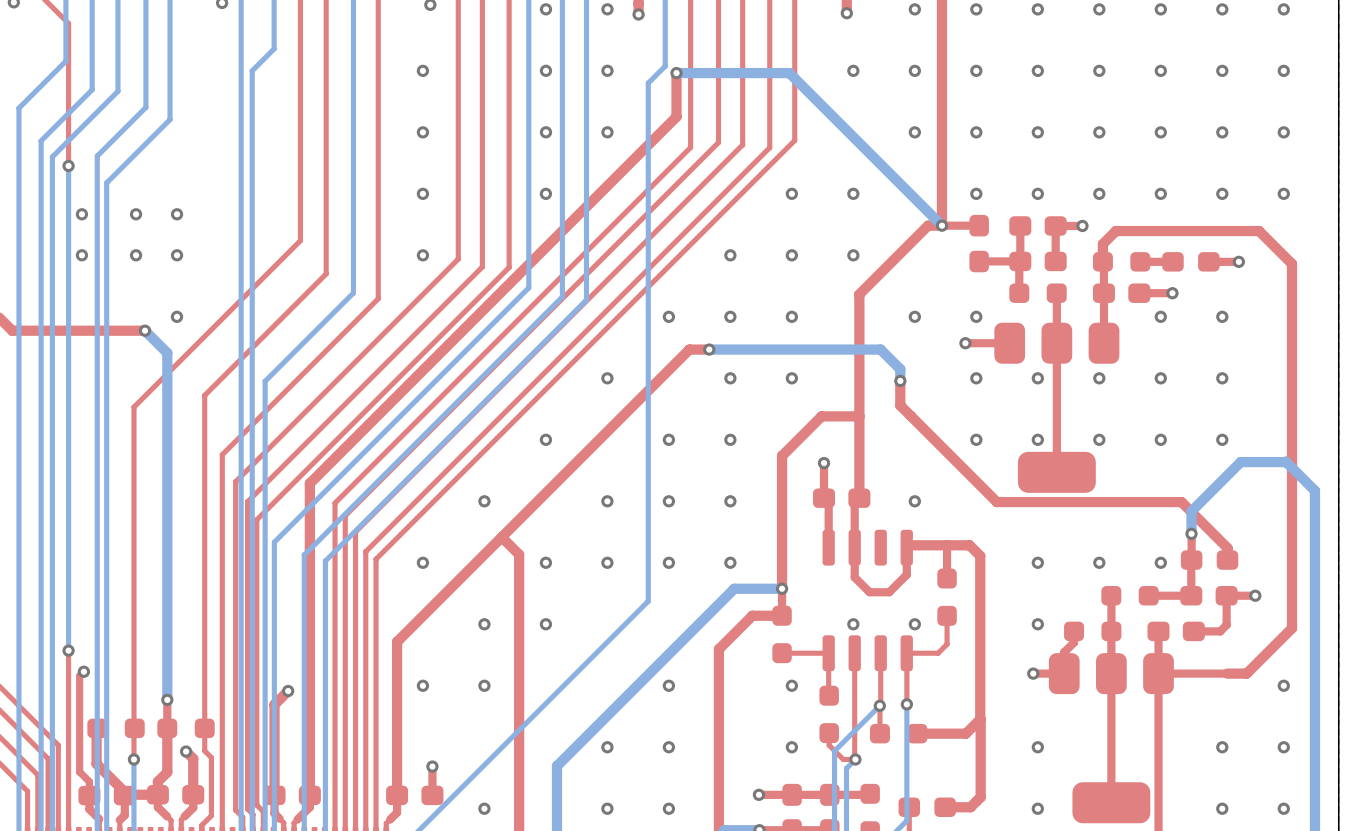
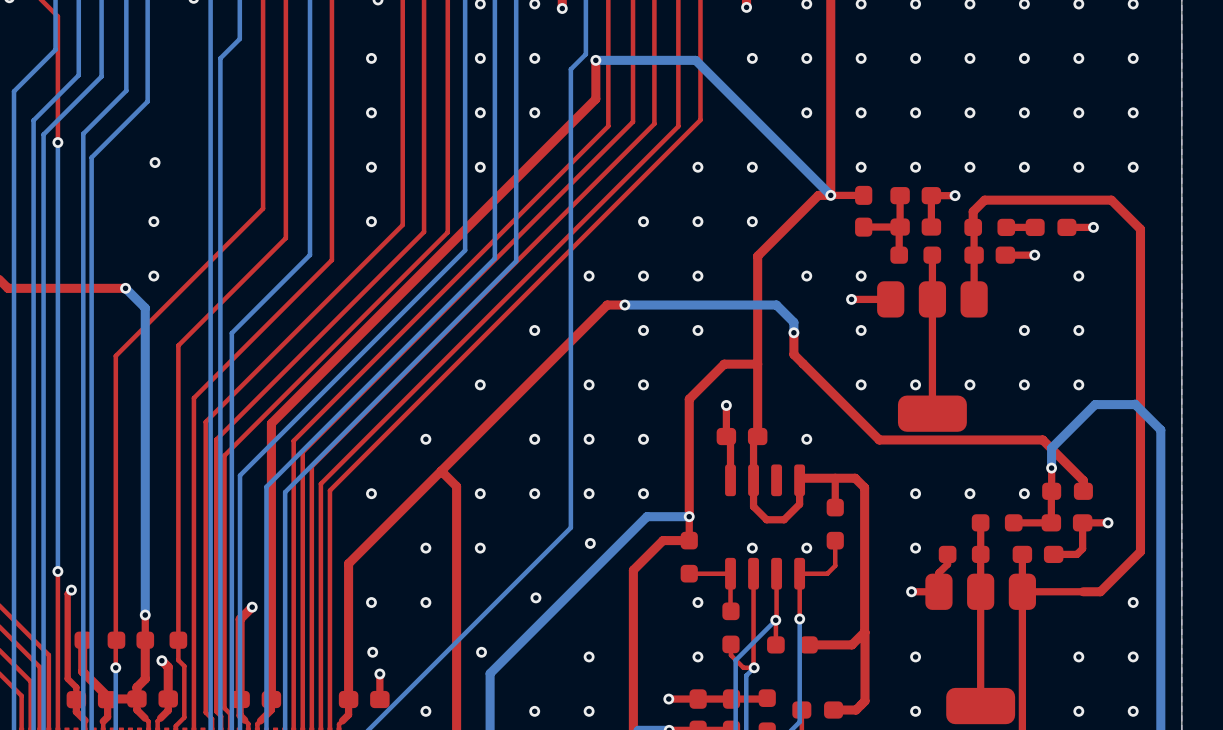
via: none -> (155, 162)
via: (81, 214) -> none
via: (136, 214) -> none
via: (177, 214) -> none
via: (81, 255) -> none
via: (136, 255) -> none
via: (1160, 316) -> none
via: (1037, 378) -> none
via: (1099, 378) -> none
via: none -> (590, 543)
via: none -> (535, 597)
via: (668, 685) -> none
via: none -> (372, 652)
via: none -> (481, 652)
via: (607, 747) -> none

